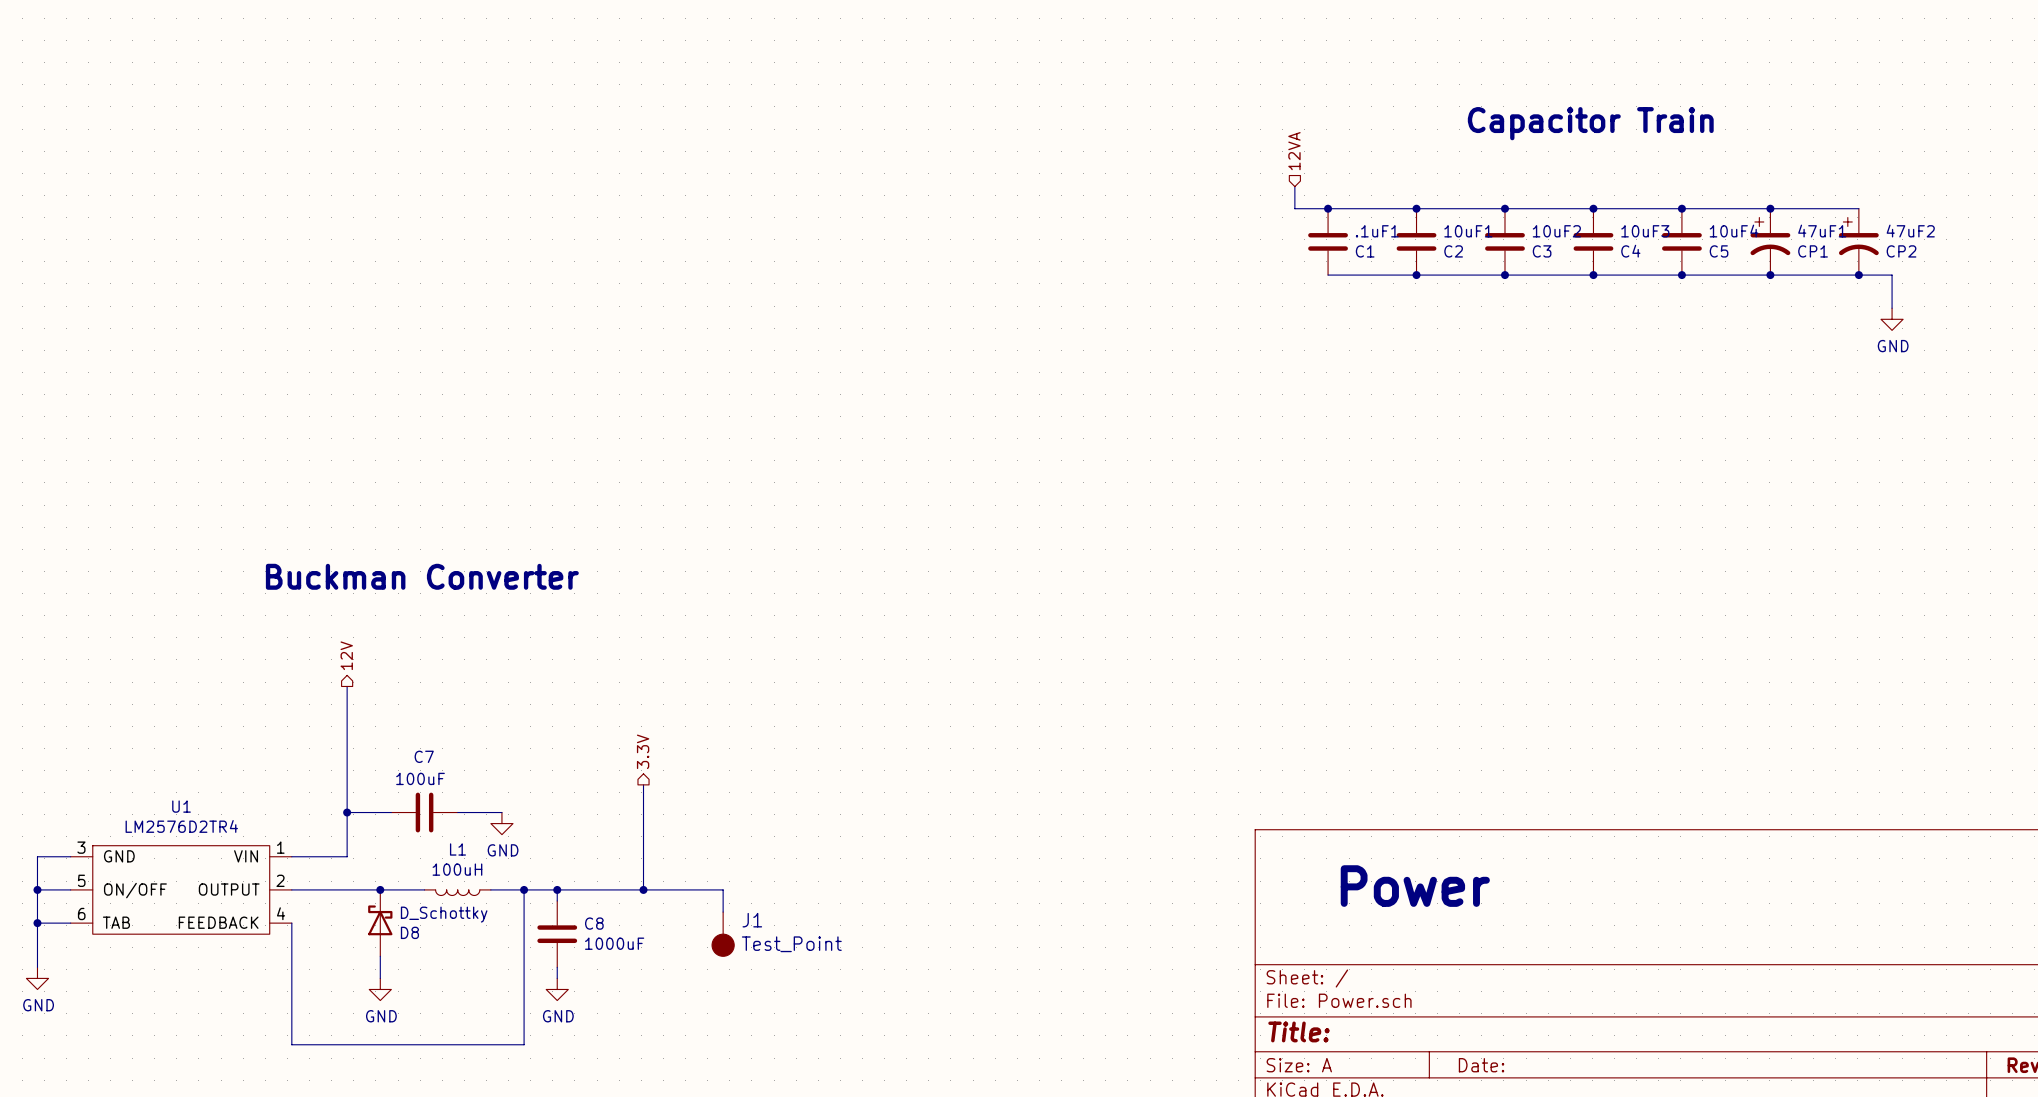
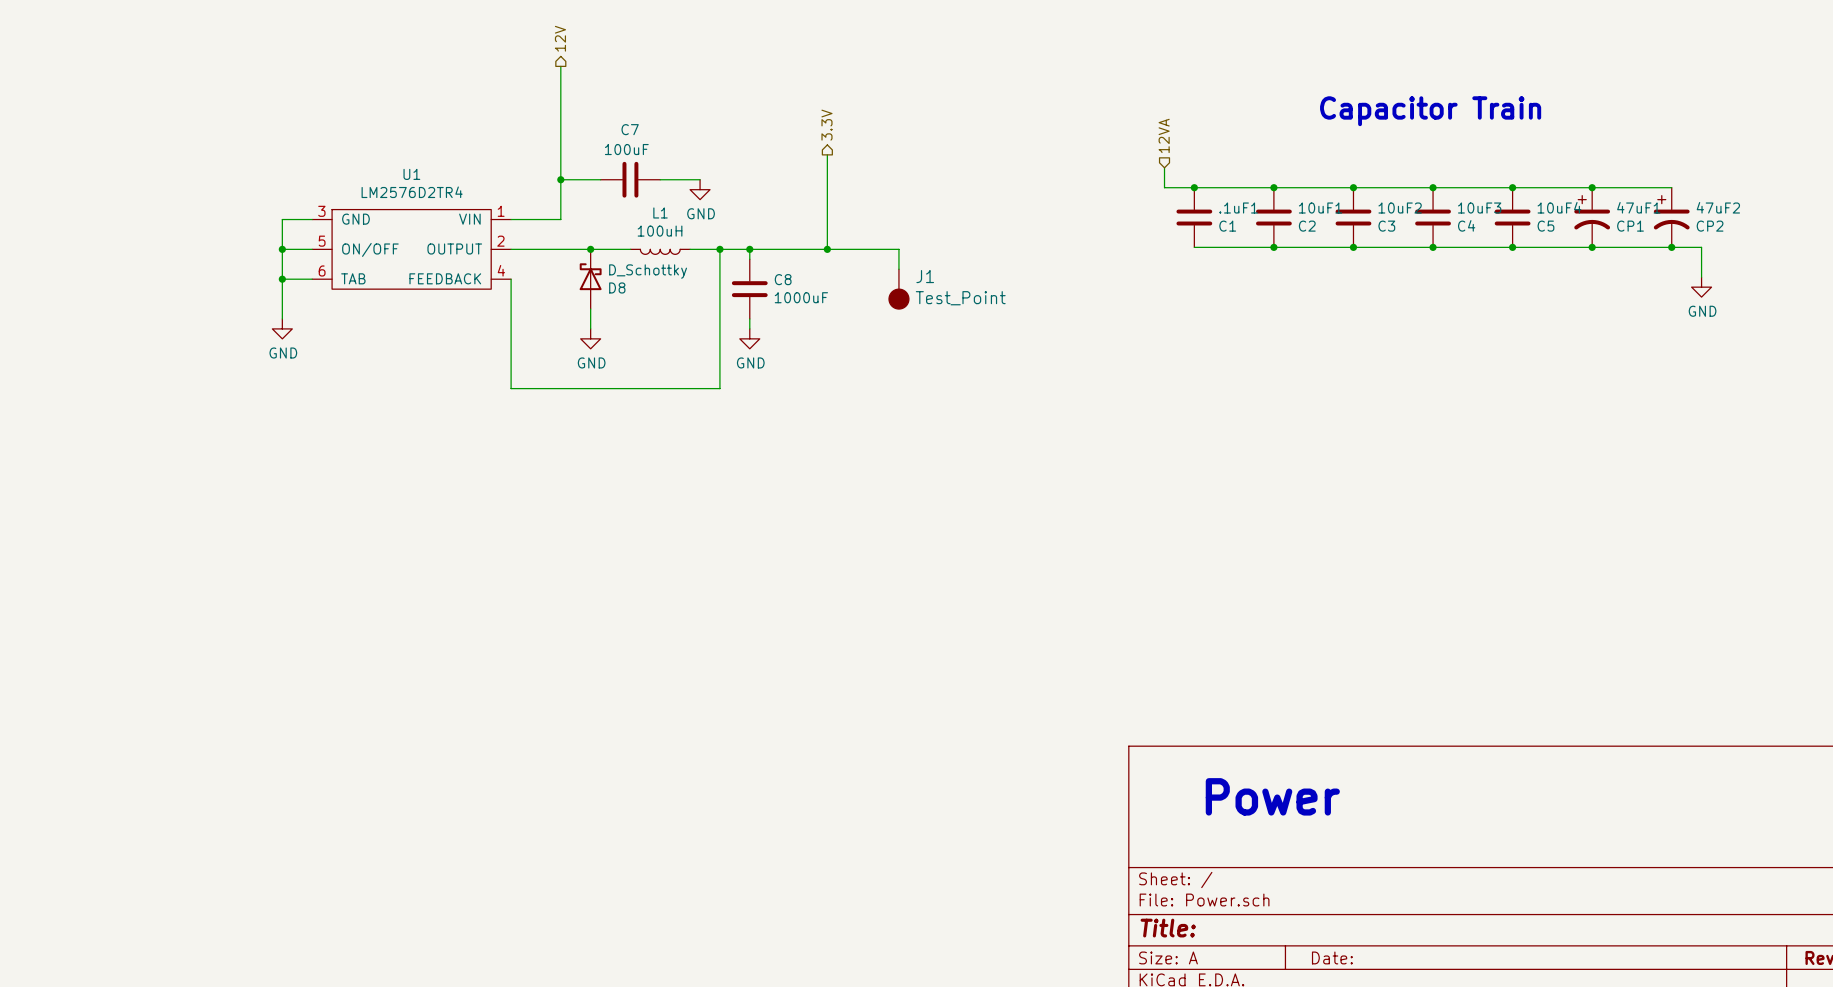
hierarchical label: none -> 12V (560, 38)
wire: none -> (560, 66) (560, 219) (511, 219)
hierarchical label: none -> 3.3V (826, 125)
wire: none -> (827, 154) (827, 249)
wire: none -> (560, 179) (600, 179)
junction: none -> (560, 179)
wire: none -> (660, 179) (700, 179)
power symbol: none -> GND (700, 189)
wire: none -> (312, 219) (282, 219) (282, 318)
wire: none -> (282, 249) (312, 249)
junction: none -> (282, 249)
wire: none -> (511, 249) (630, 249)
junction: none -> (590, 249)
wire: none -> (690, 249) (898, 249) (898, 269)
wire: none -> (719, 249) (719, 388) (511, 388) (511, 279)
junction: none -> (719, 249)
wire: none -> (749, 249) (749, 259)
junction: none -> (749, 249)
junction: none -> (827, 249)
wire: none -> (282, 279) (312, 279)
junction: none -> (282, 279)
wire: none -> (590, 309) (590, 328)
wire: none -> (749, 318) (749, 328)
power symbol: none -> GND (282, 328)
power symbol: none -> GND (590, 338)
power symbol: none -> GND (749, 338)
text: Buckman Converter (422, 576) -> none
hierarchical label: 12V (346, 655) -> none
wire: (347, 686) (347, 856) (291, 856) -> none
hierarchical label: 3.3V (643, 751) -> none
wire: (643, 784) (643, 889) -> none
wire: (347, 812) (391, 812) -> none
junction: (347, 812) -> none
C7 position: (424, 812) -> (630, 179)
wire: (457, 812) (501, 812) -> none
power symbol: GND (501, 823) -> none
wire: (70, 856) (37, 856) (37, 967) -> none
wire: (37, 889) (70, 889) -> none
junction: (37, 889) -> none
U1 position: (181, 889) -> (411, 249)
wire: (291, 889) (424, 889) -> none
junction: (380, 889) -> none
wire: (490, 889) (723, 889) (723, 912) -> none
wire: (524, 889) (524, 1044) (291, 1044) (291, 923) -> none
junction: (524, 889) -> none
wire: (557, 889) (557, 901) -> none
junction: (557, 889) -> none
junction: (643, 889) -> none
L1 position: (457, 892) -> (660, 251)
wire: (37, 923) (70, 923) -> none
junction: (37, 923) -> none
D8 position: (380, 923) -> (590, 279)
C8 position: (557, 934) -> (749, 289)
J1 position: (723, 934) -> (898, 289)
wire: (380, 956) (380, 978) -> none
wire: (557, 967) (557, 978) -> none
power symbol: GND (37, 978) -> none
power symbol: GND (380, 989) -> none
power symbol: GND (557, 989) -> none

